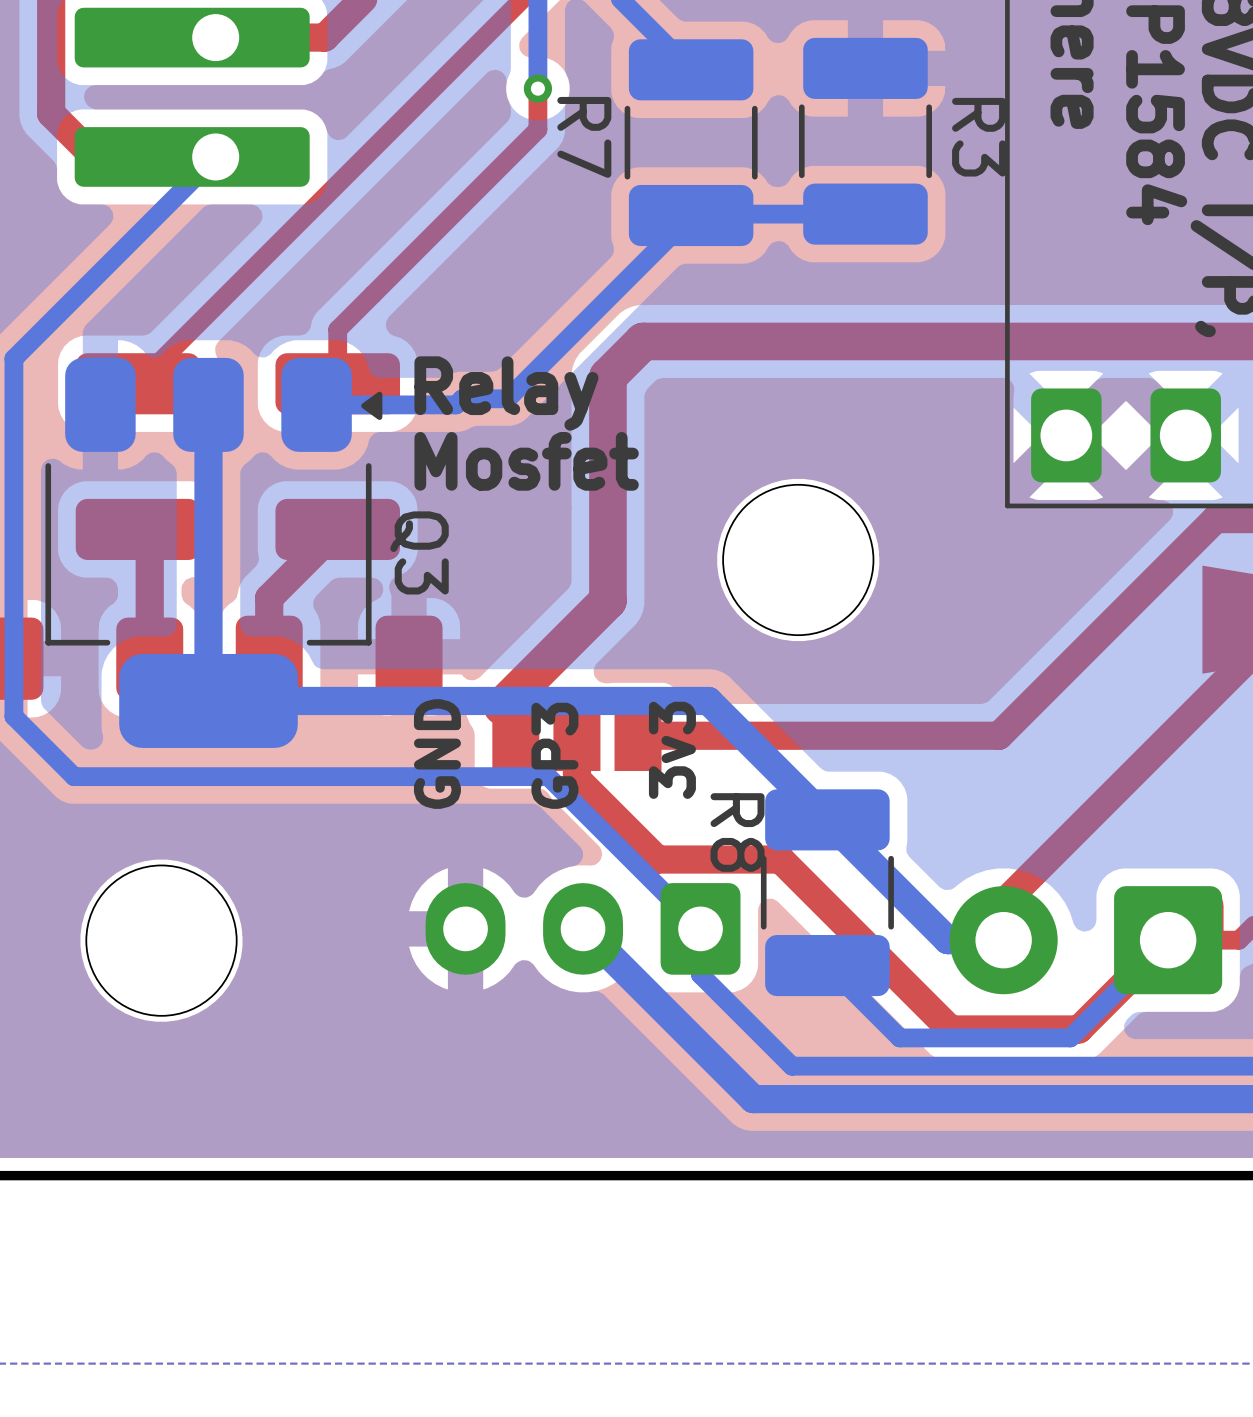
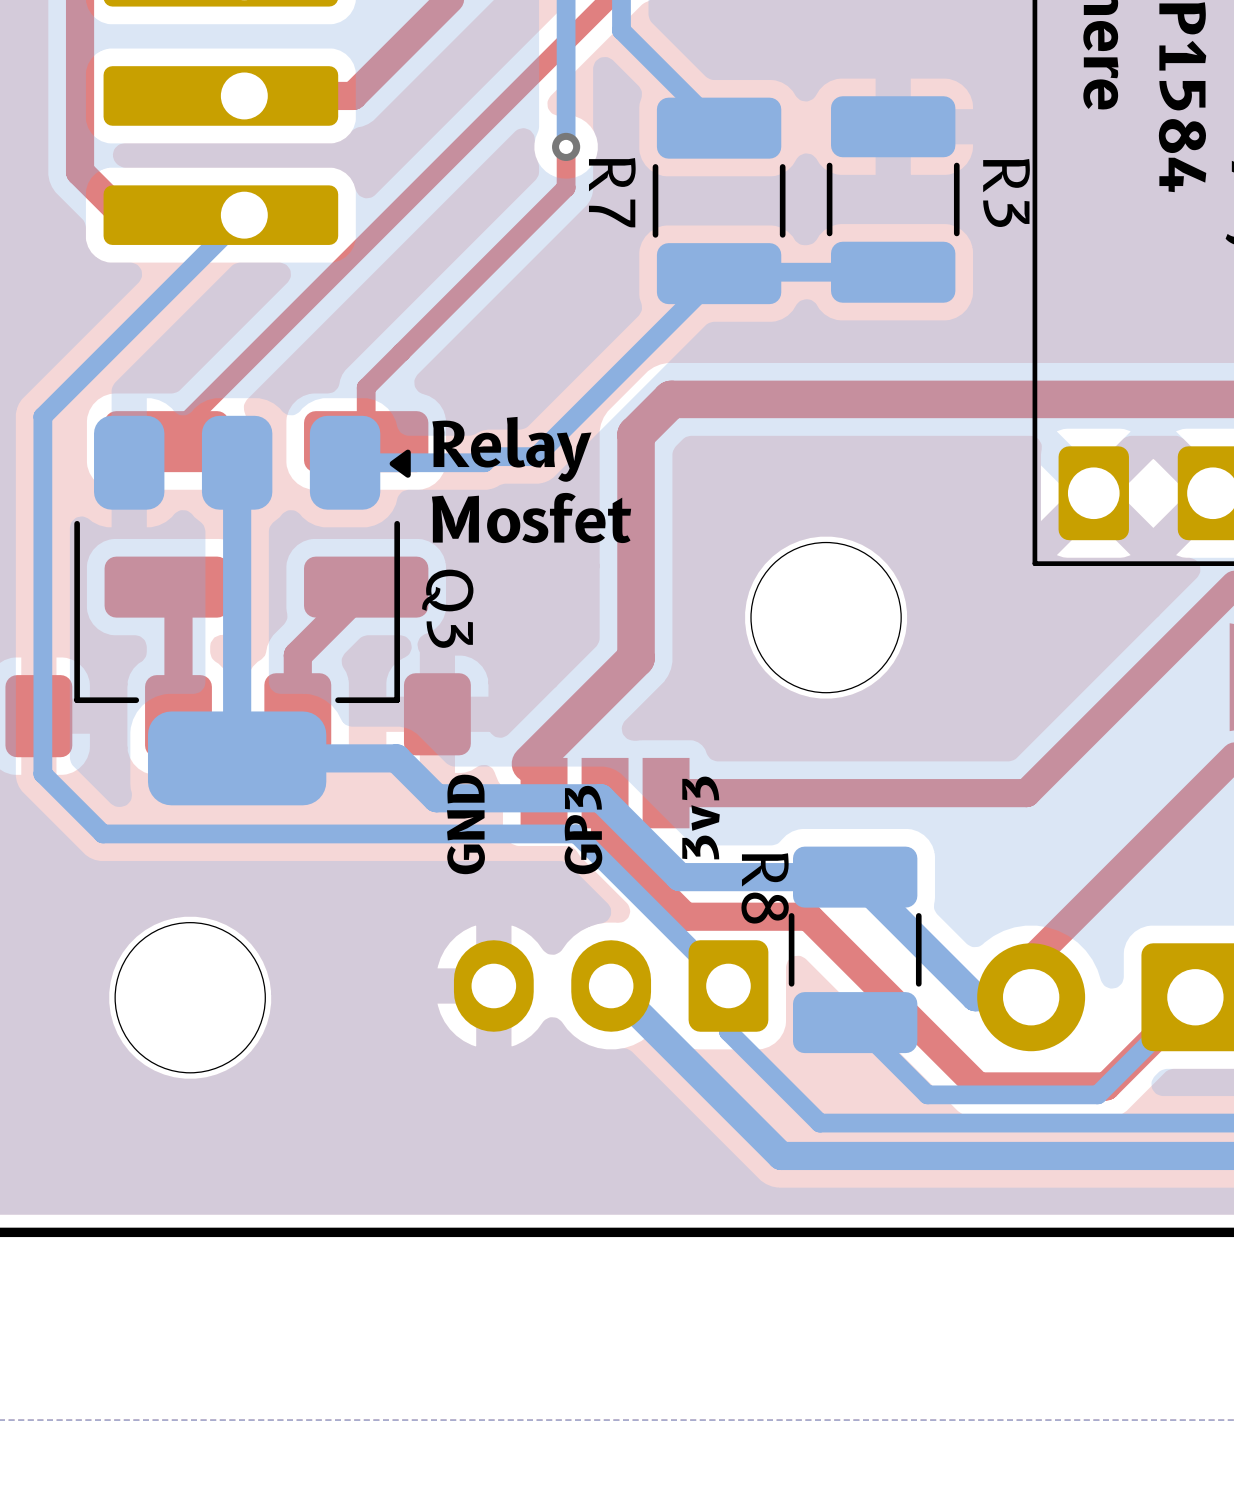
bottom track: (368, 700) (708, 700) (827, 819) -> (396, 758) (436, 798) (600, 798) (679, 877) (855, 877)

